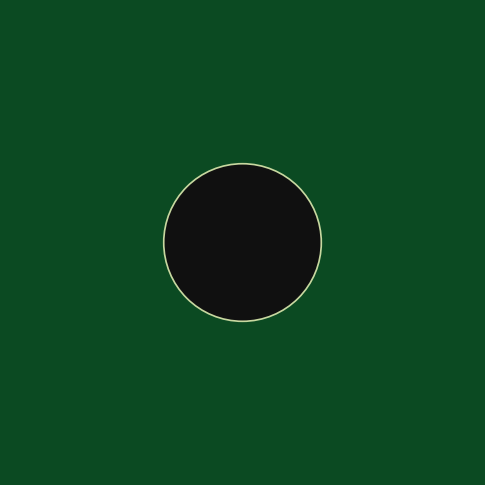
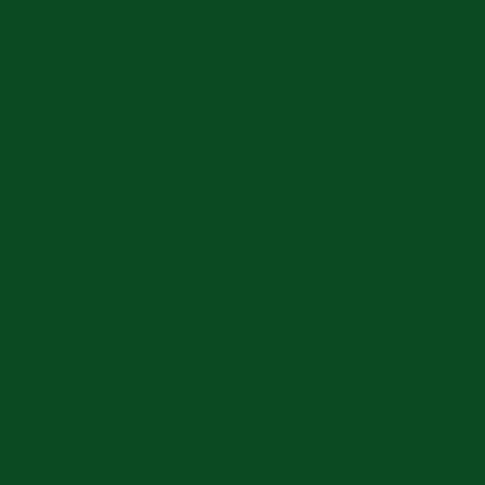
part: (242, 242) -> none

